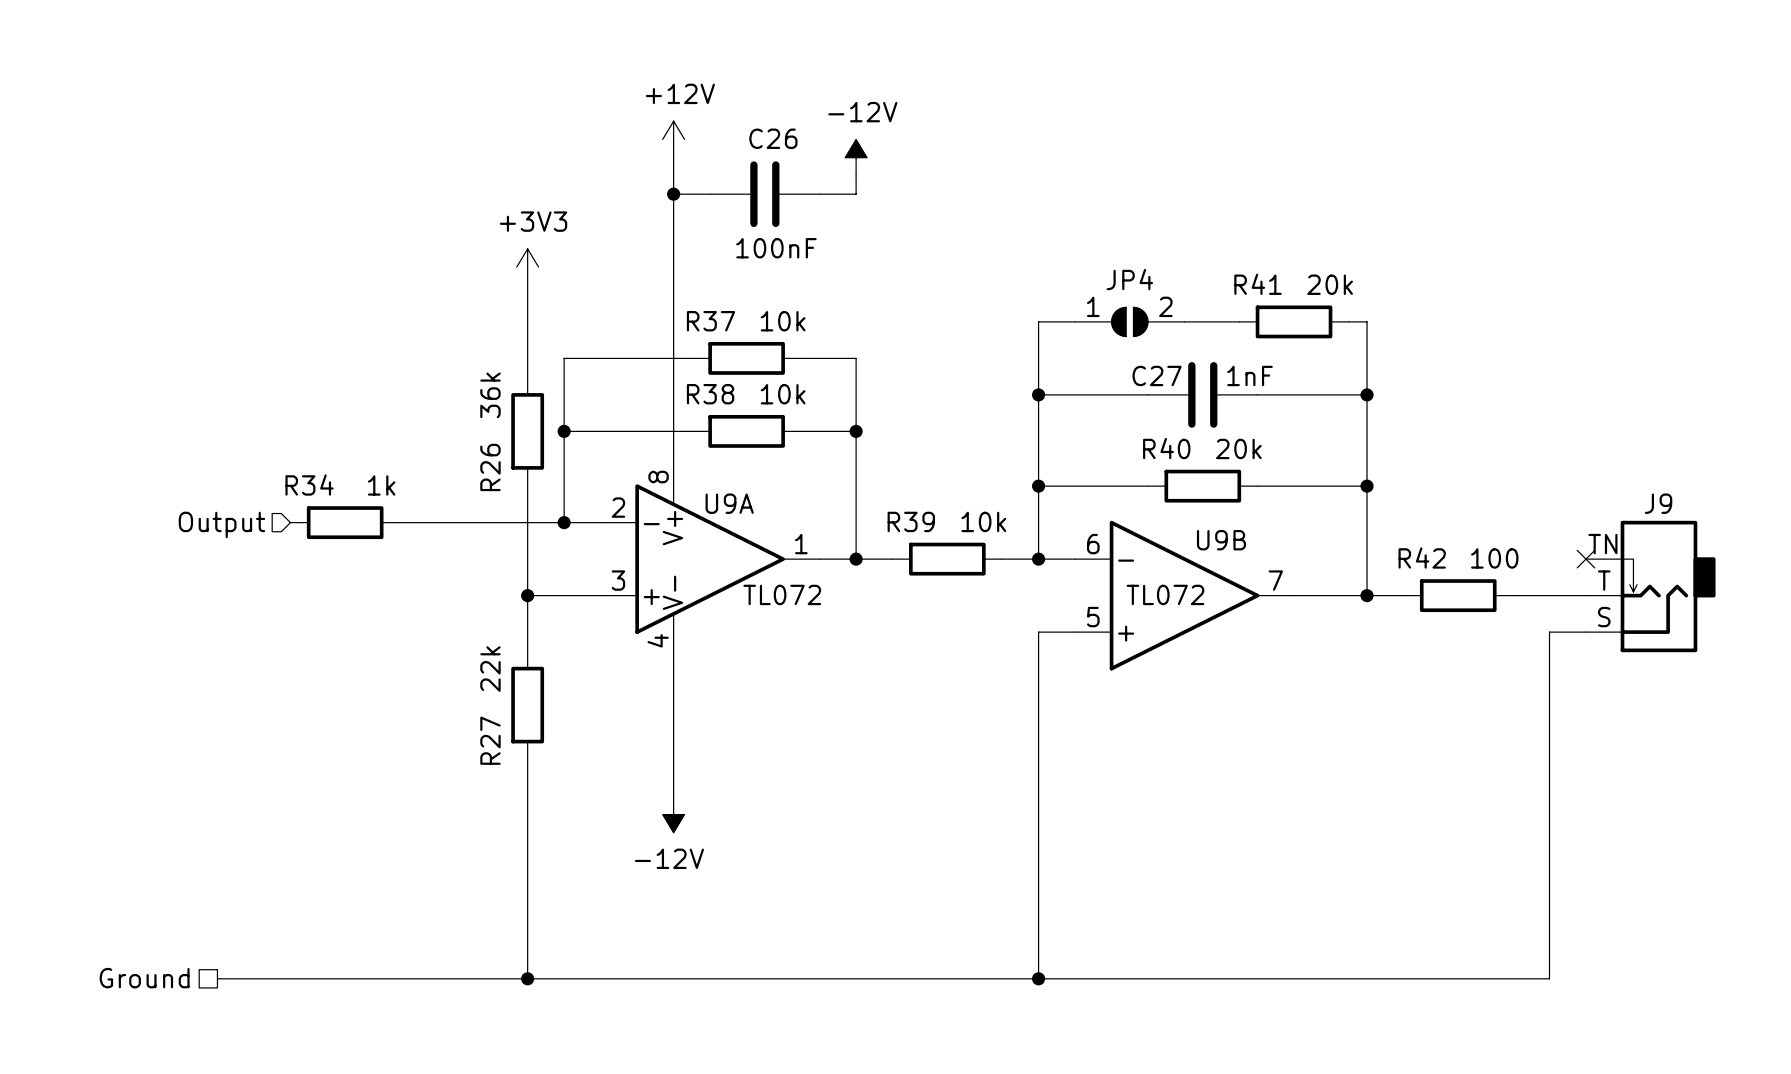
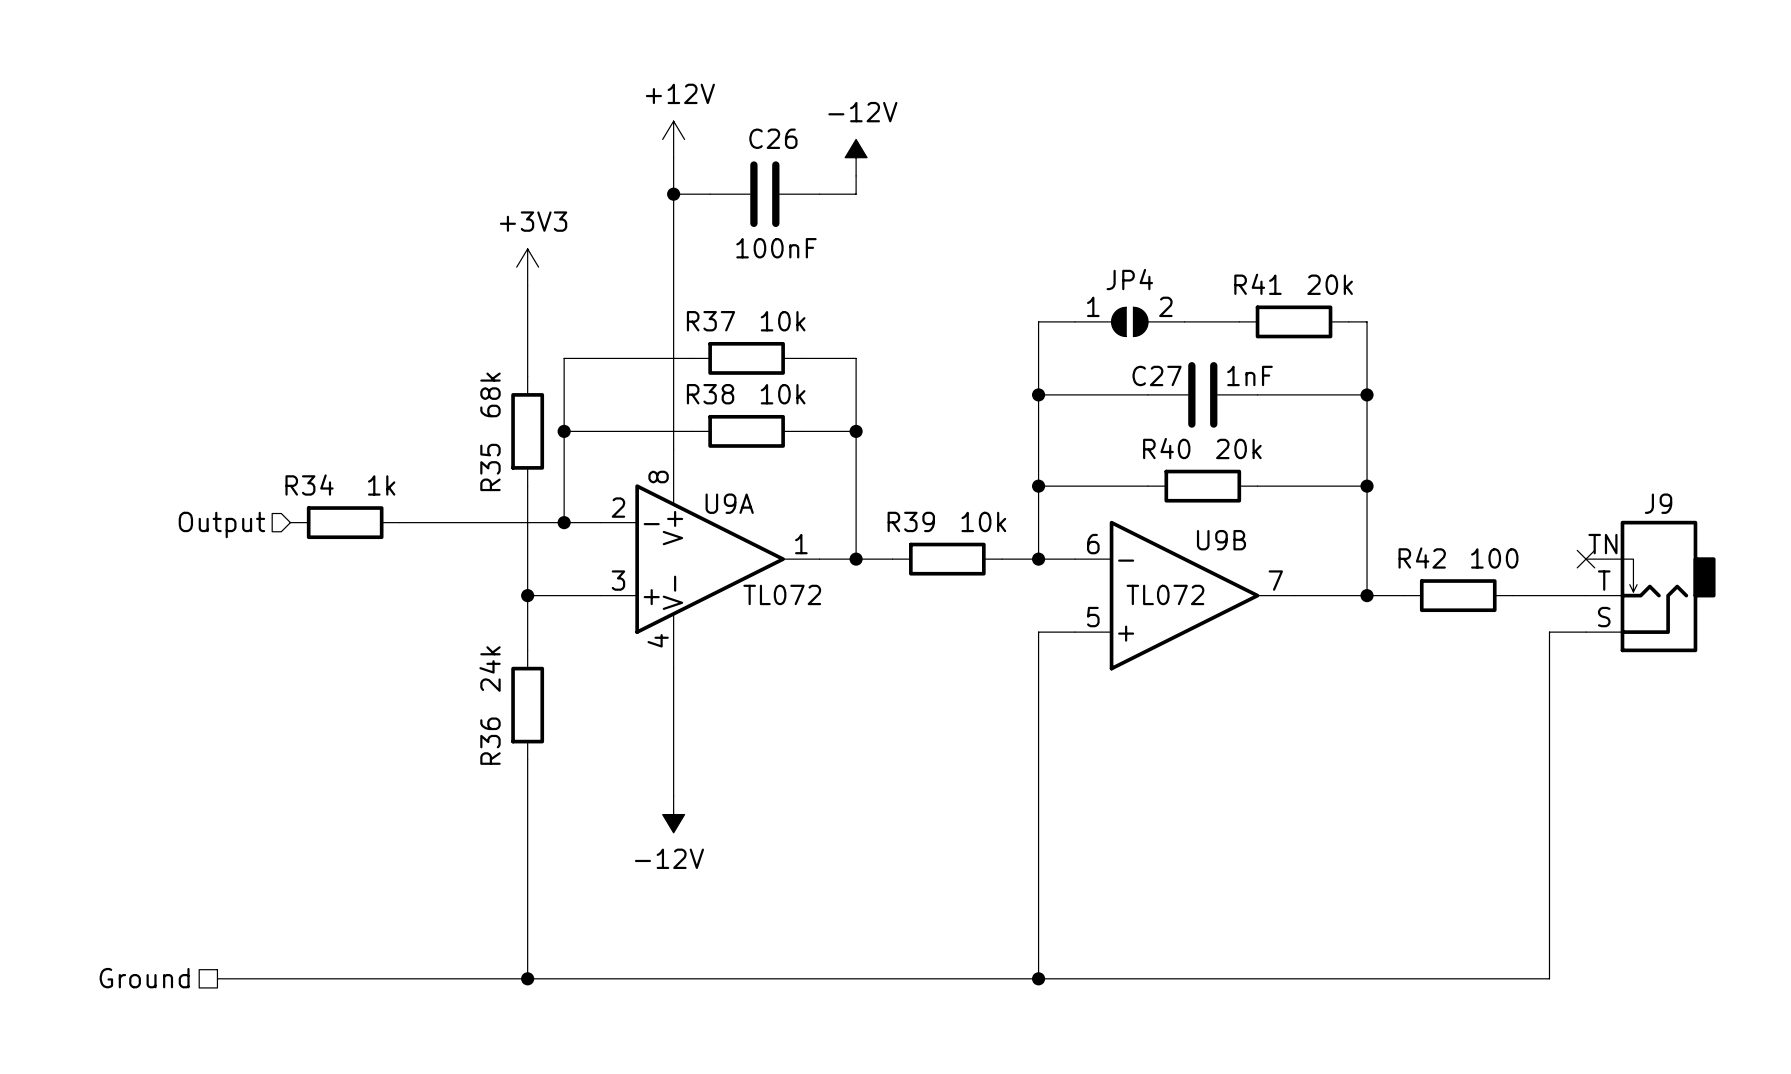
R26 value: 36k (490, 395) -> 68k (490, 394)
R26 name: R26 (490, 467) -> R35 (490, 467)
R27 value: 22k (490, 669) -> 24k (490, 669)
R27 name: R27 (490, 740) -> R36 (490, 741)

